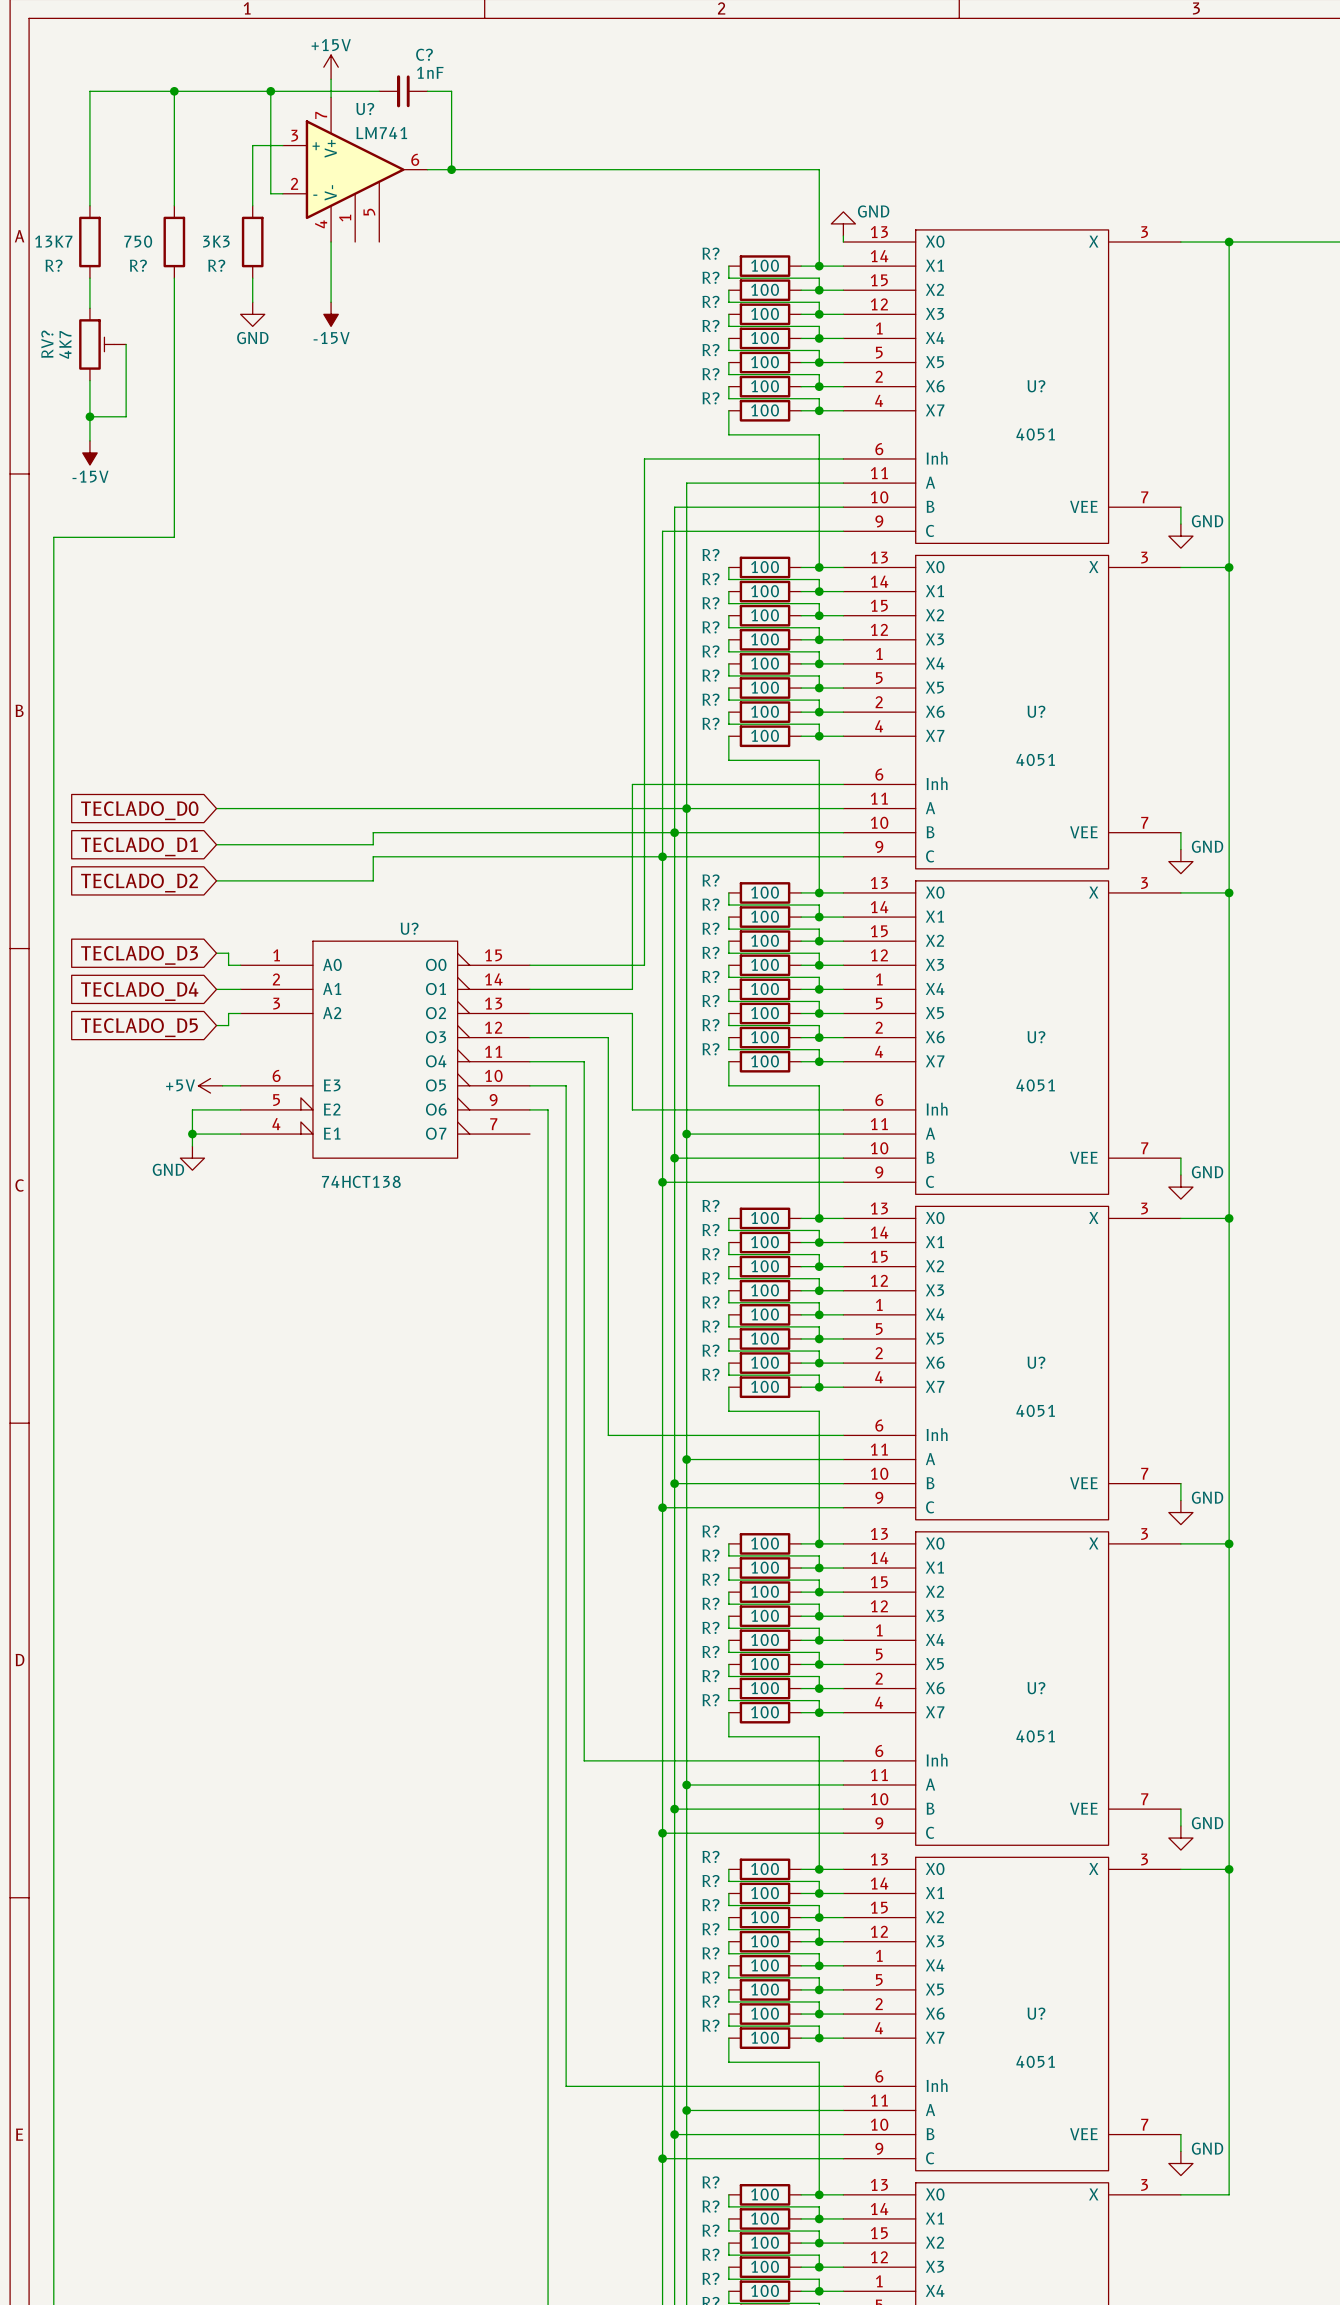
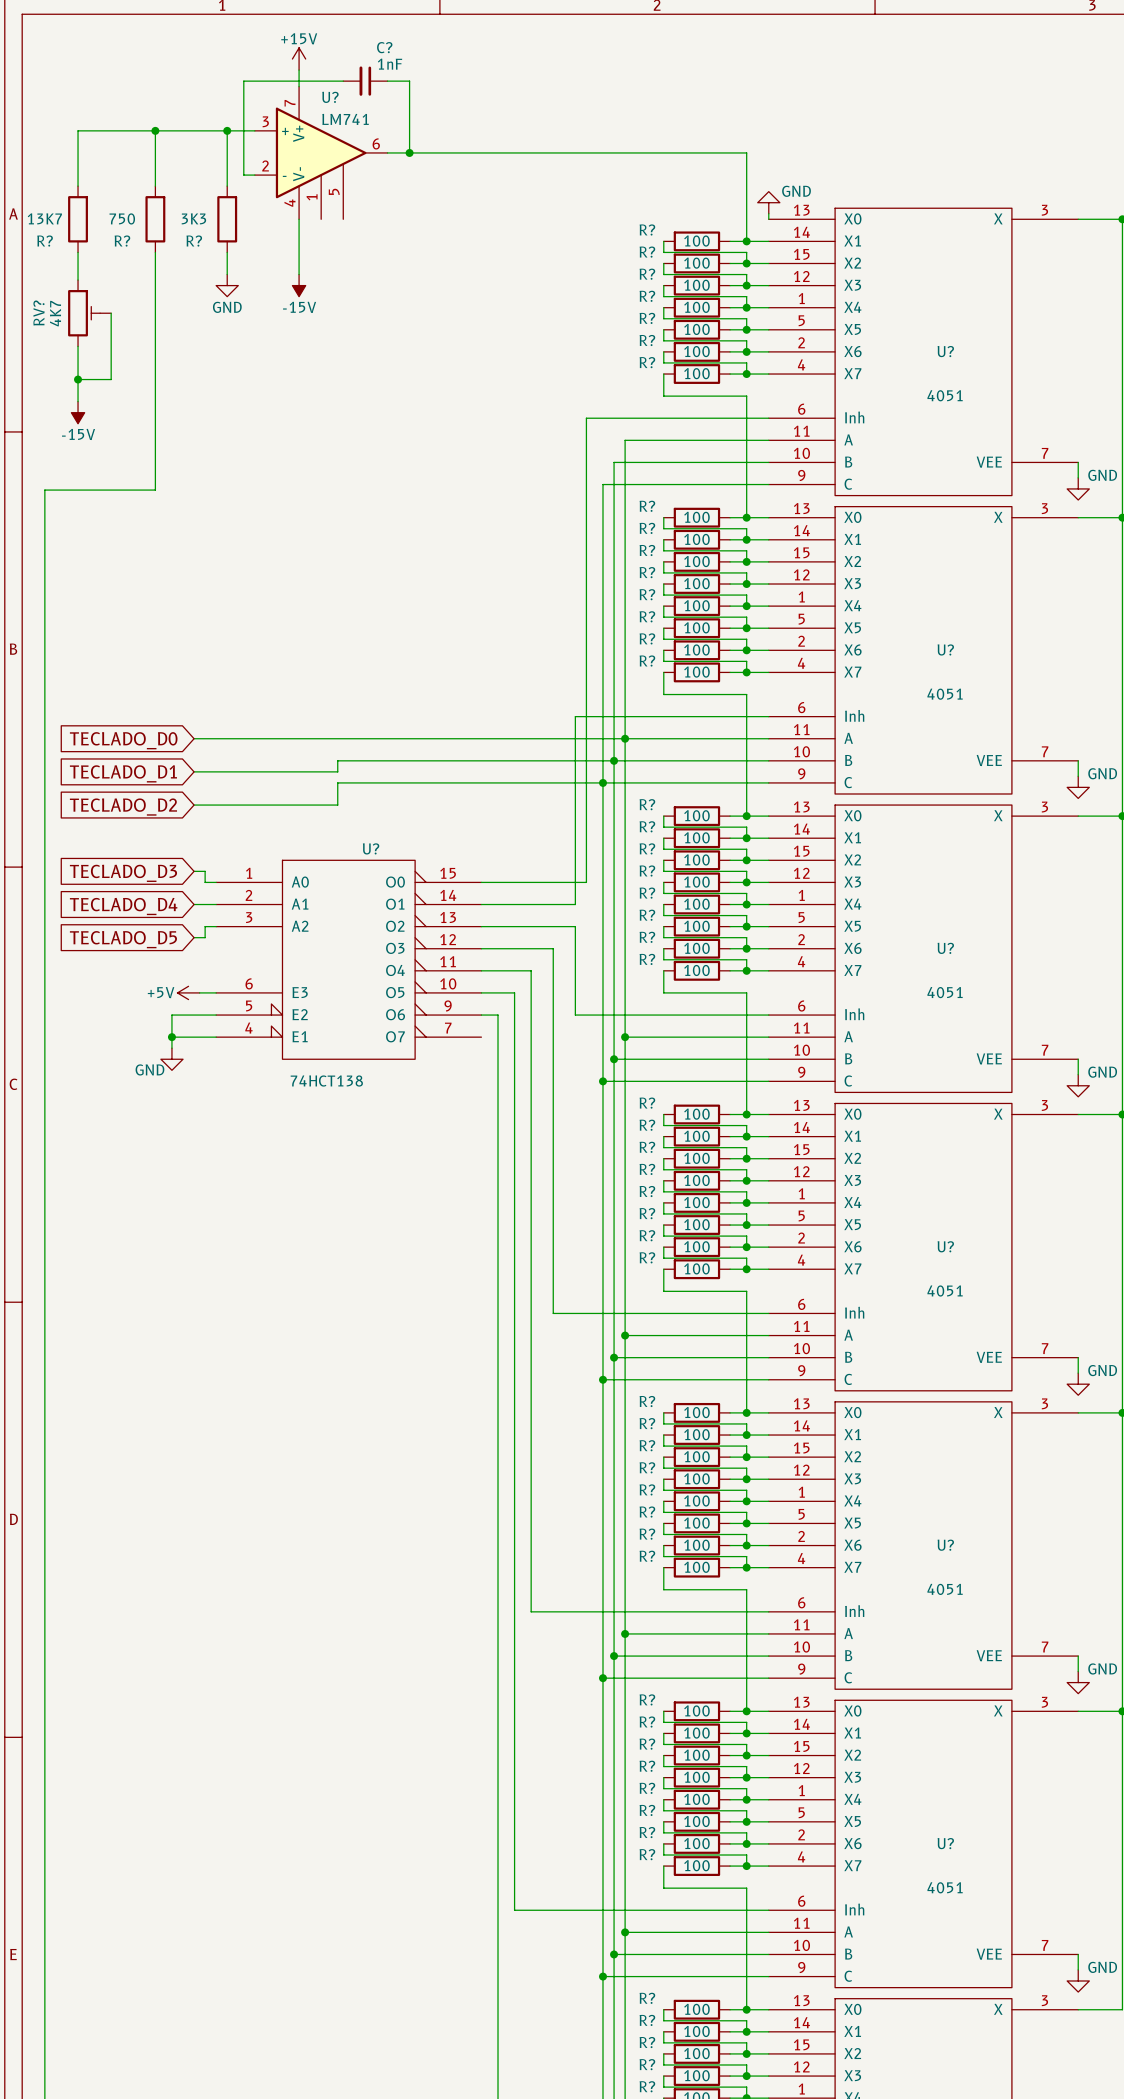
wire: (174, 91) (174, 145) -> none
junction: (174, 91) -> none
wire: (270, 91) (89, 91) (89, 145) -> (227, 130) (78, 130)
junction: (270, 91) -> none
junction: none -> (155, 130)
junction: none -> (227, 130)

